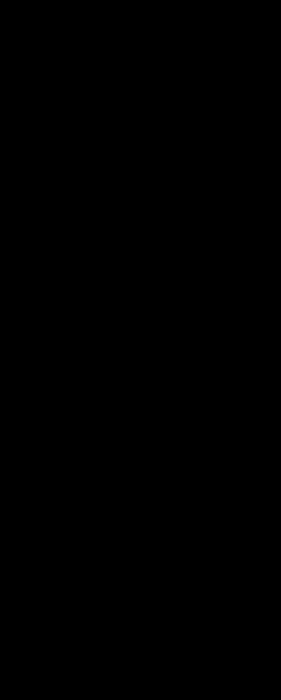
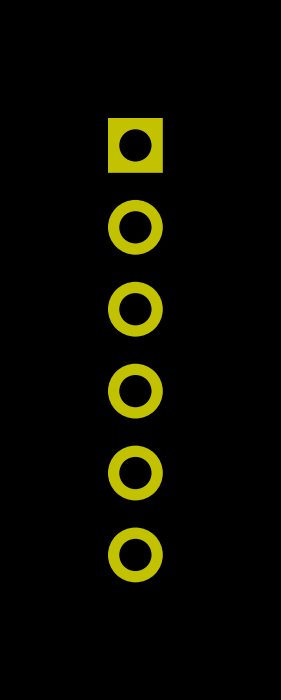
part: none -> (135, 350)

